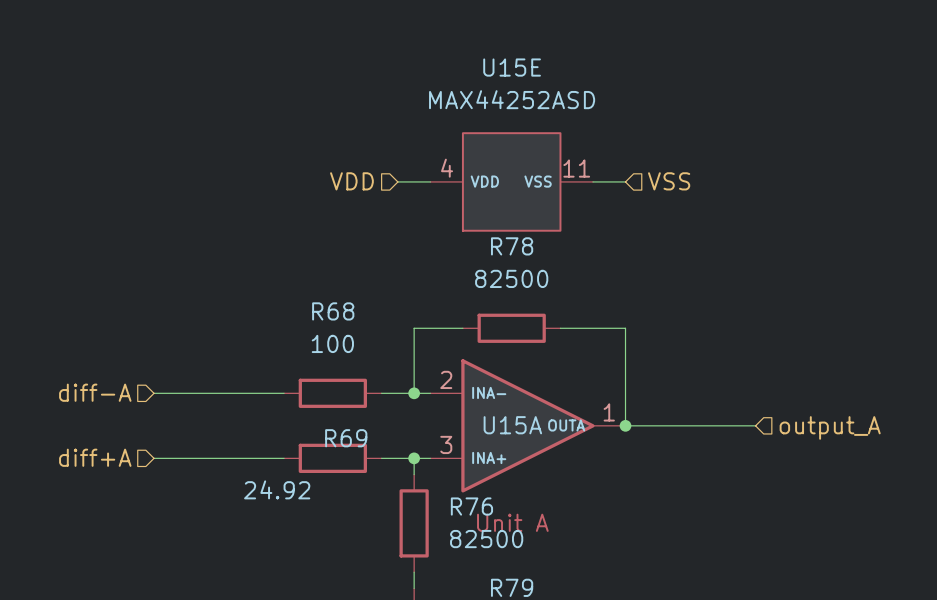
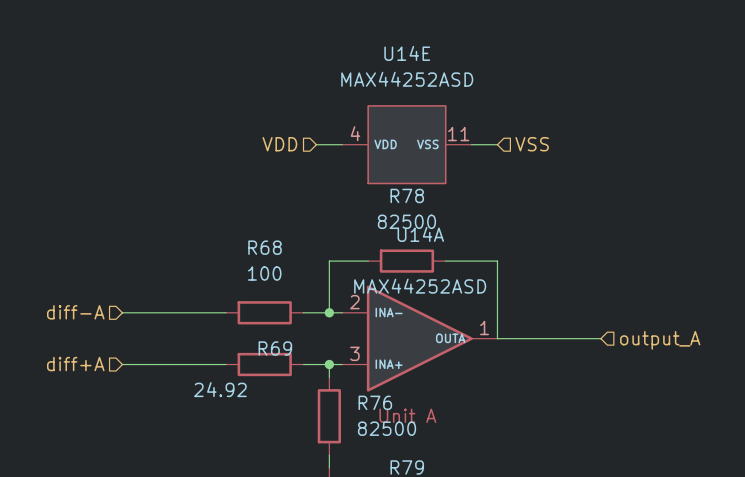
U15E name: U15E (512, 67) -> U14E (407, 53)
U15A value: none -> MAX44252ASD (420, 286)
U15A name: U15A (512, 425) -> U14A (420, 234)
junction: (625, 425) -> none

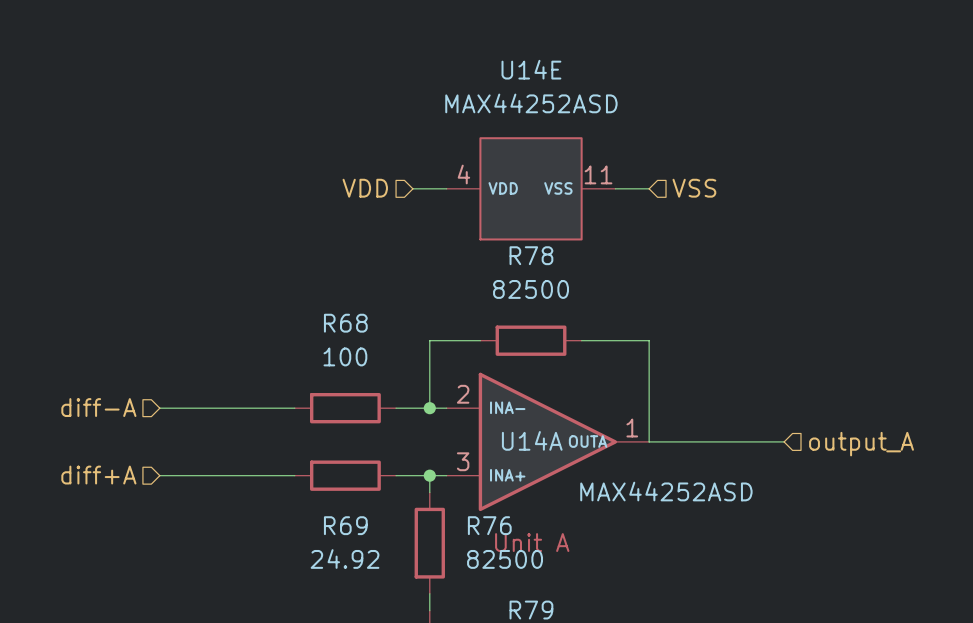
U14A name position: U14A (420, 234) -> U14A (532, 440)
U14A value position: MAX44252ASD (420, 286) -> MAX44252ASD (666, 491)
R69 name position: R69 (275, 348) -> R69 (345, 525)
R69 value position: 24.92 (220, 389) -> 24.92 (345, 559)

